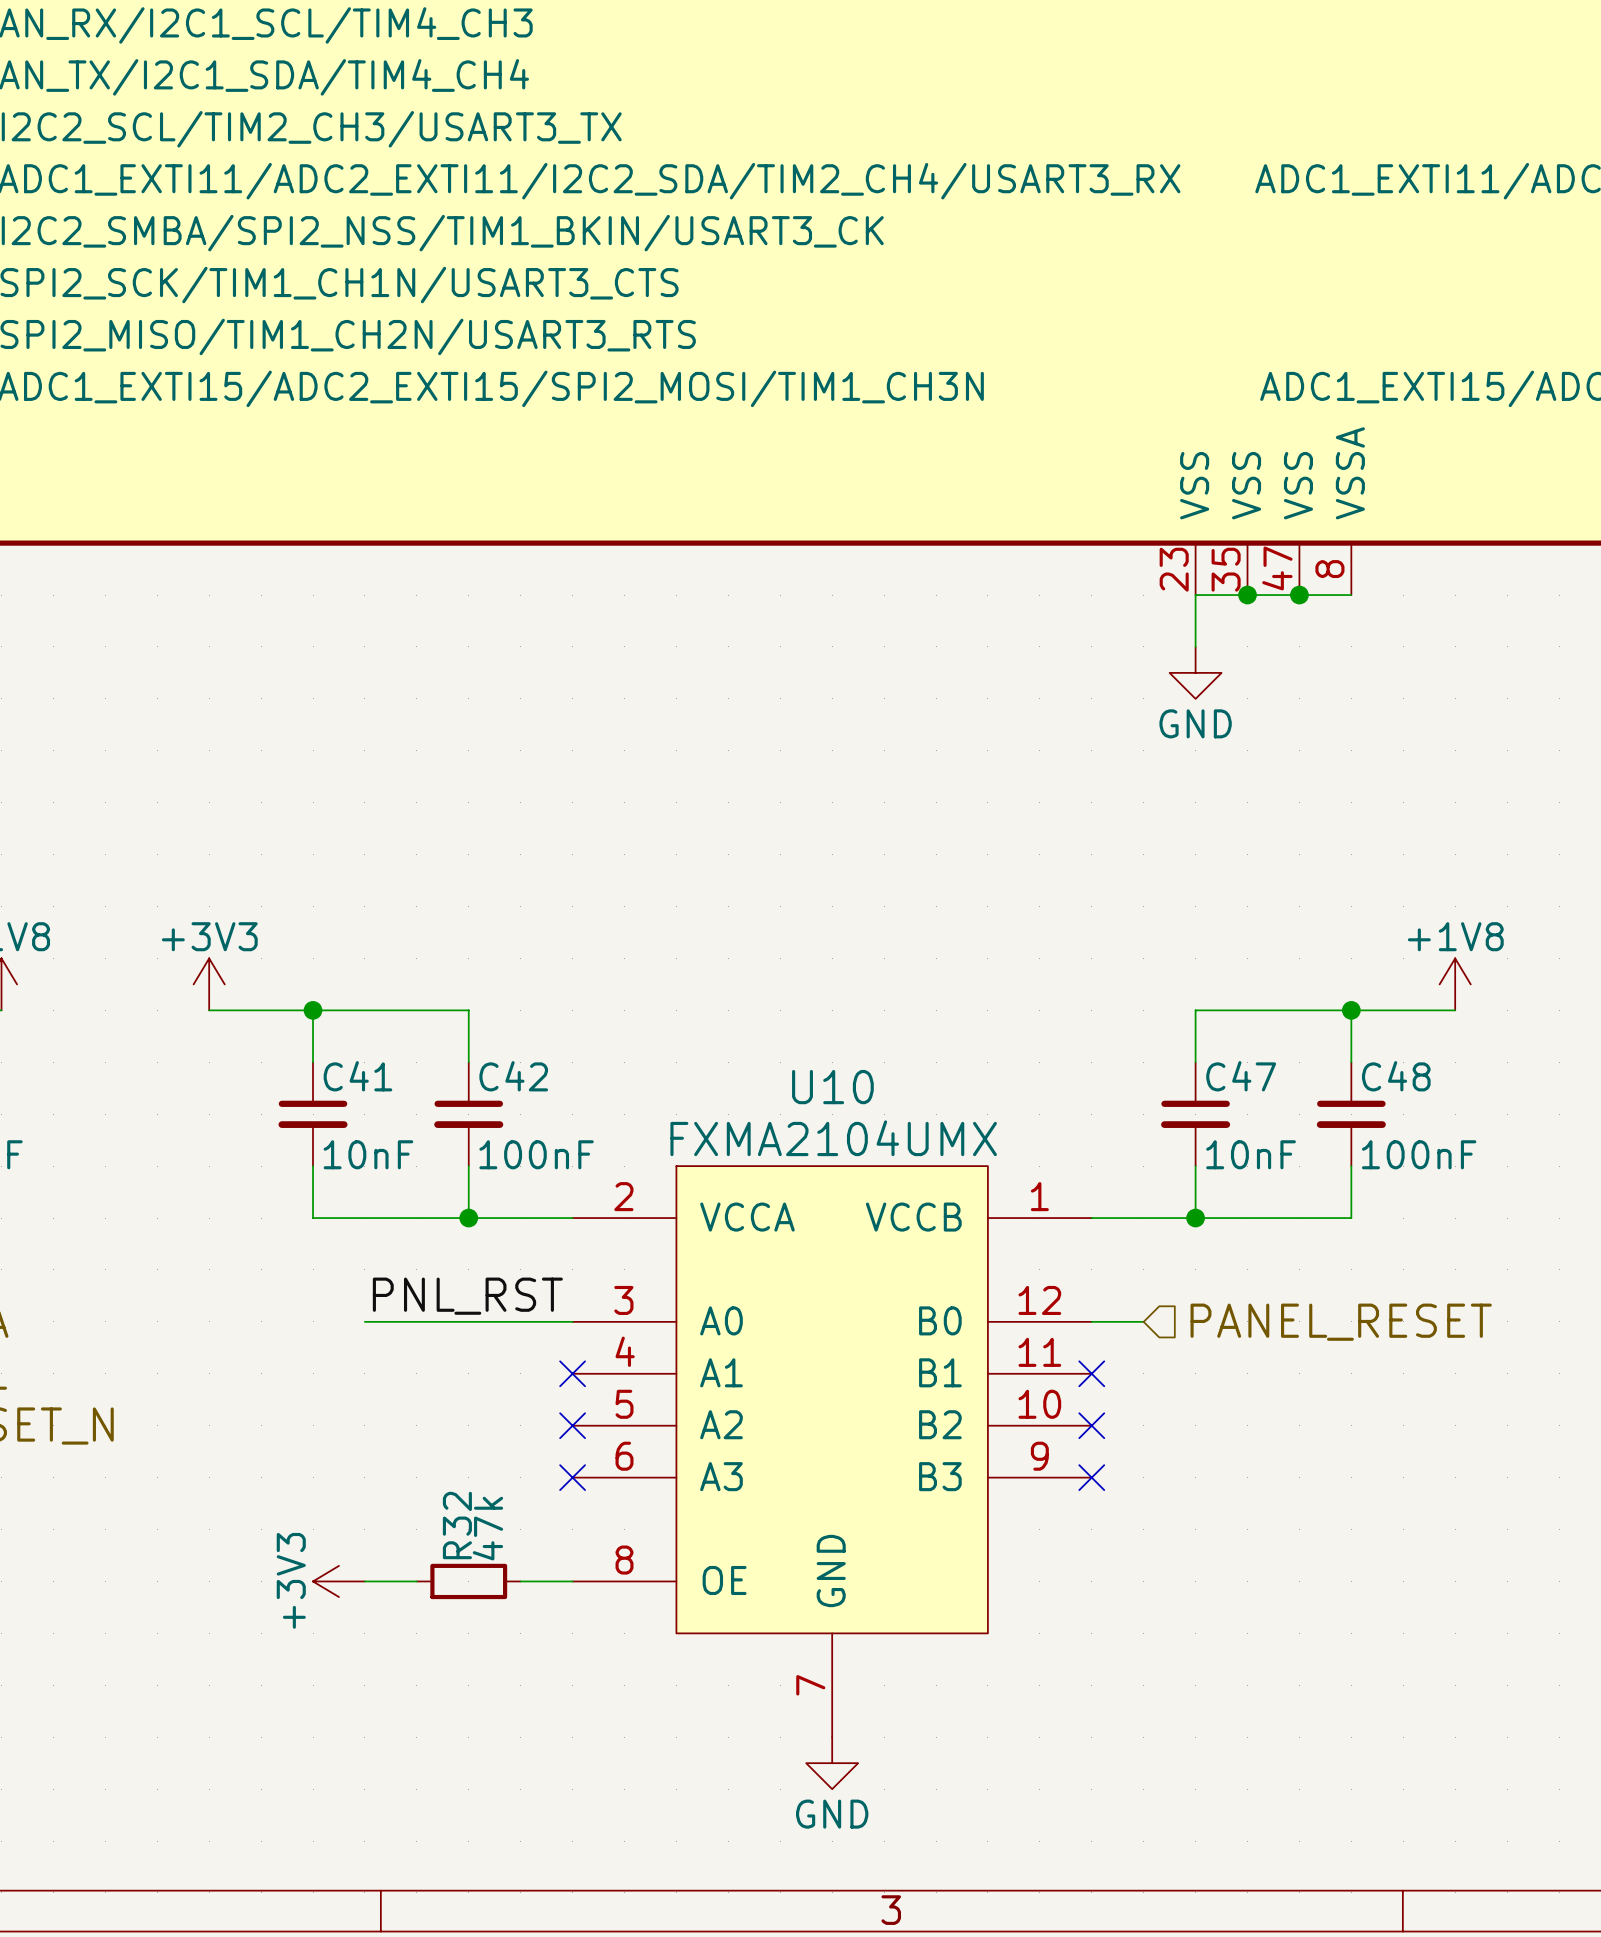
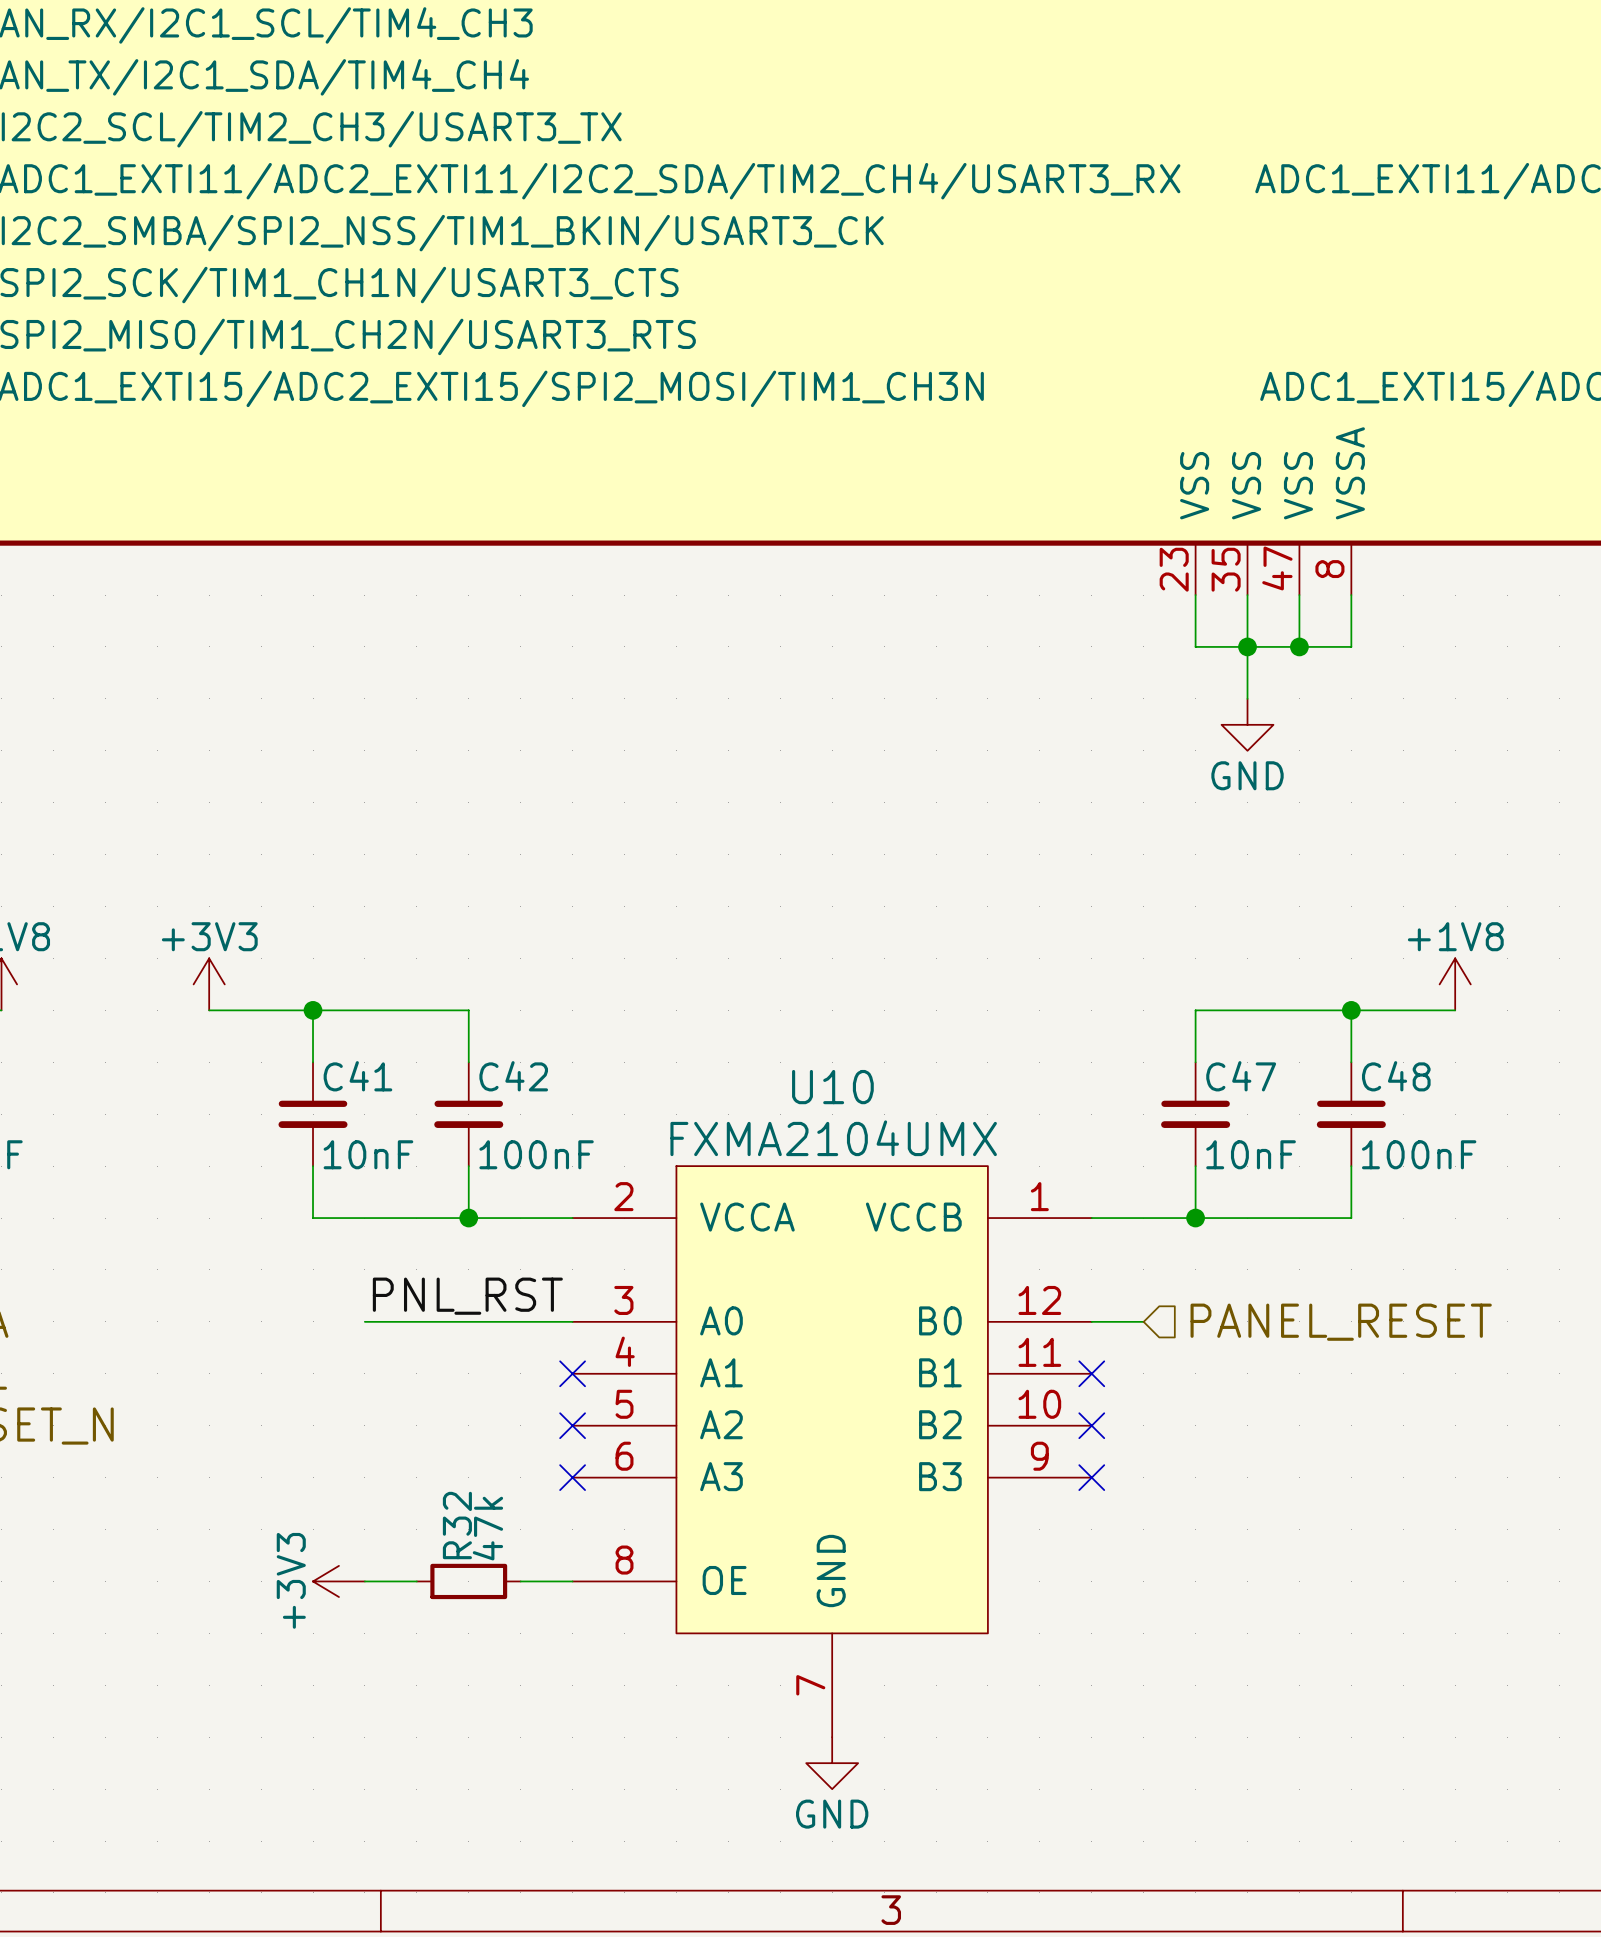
wire: (1195, 595) (1351, 595) -> (1195, 646) (1351, 646) (1351, 595)
wire: none -> (1247, 595) (1247, 698)
junction: (1247, 595) -> none
wire: none -> (1299, 595) (1299, 646)
junction: (1299, 595) -> none
junction: none -> (1247, 646)
junction: none -> (1299, 646)
power symbol position: GND (1195, 672) -> GND (1247, 724)

